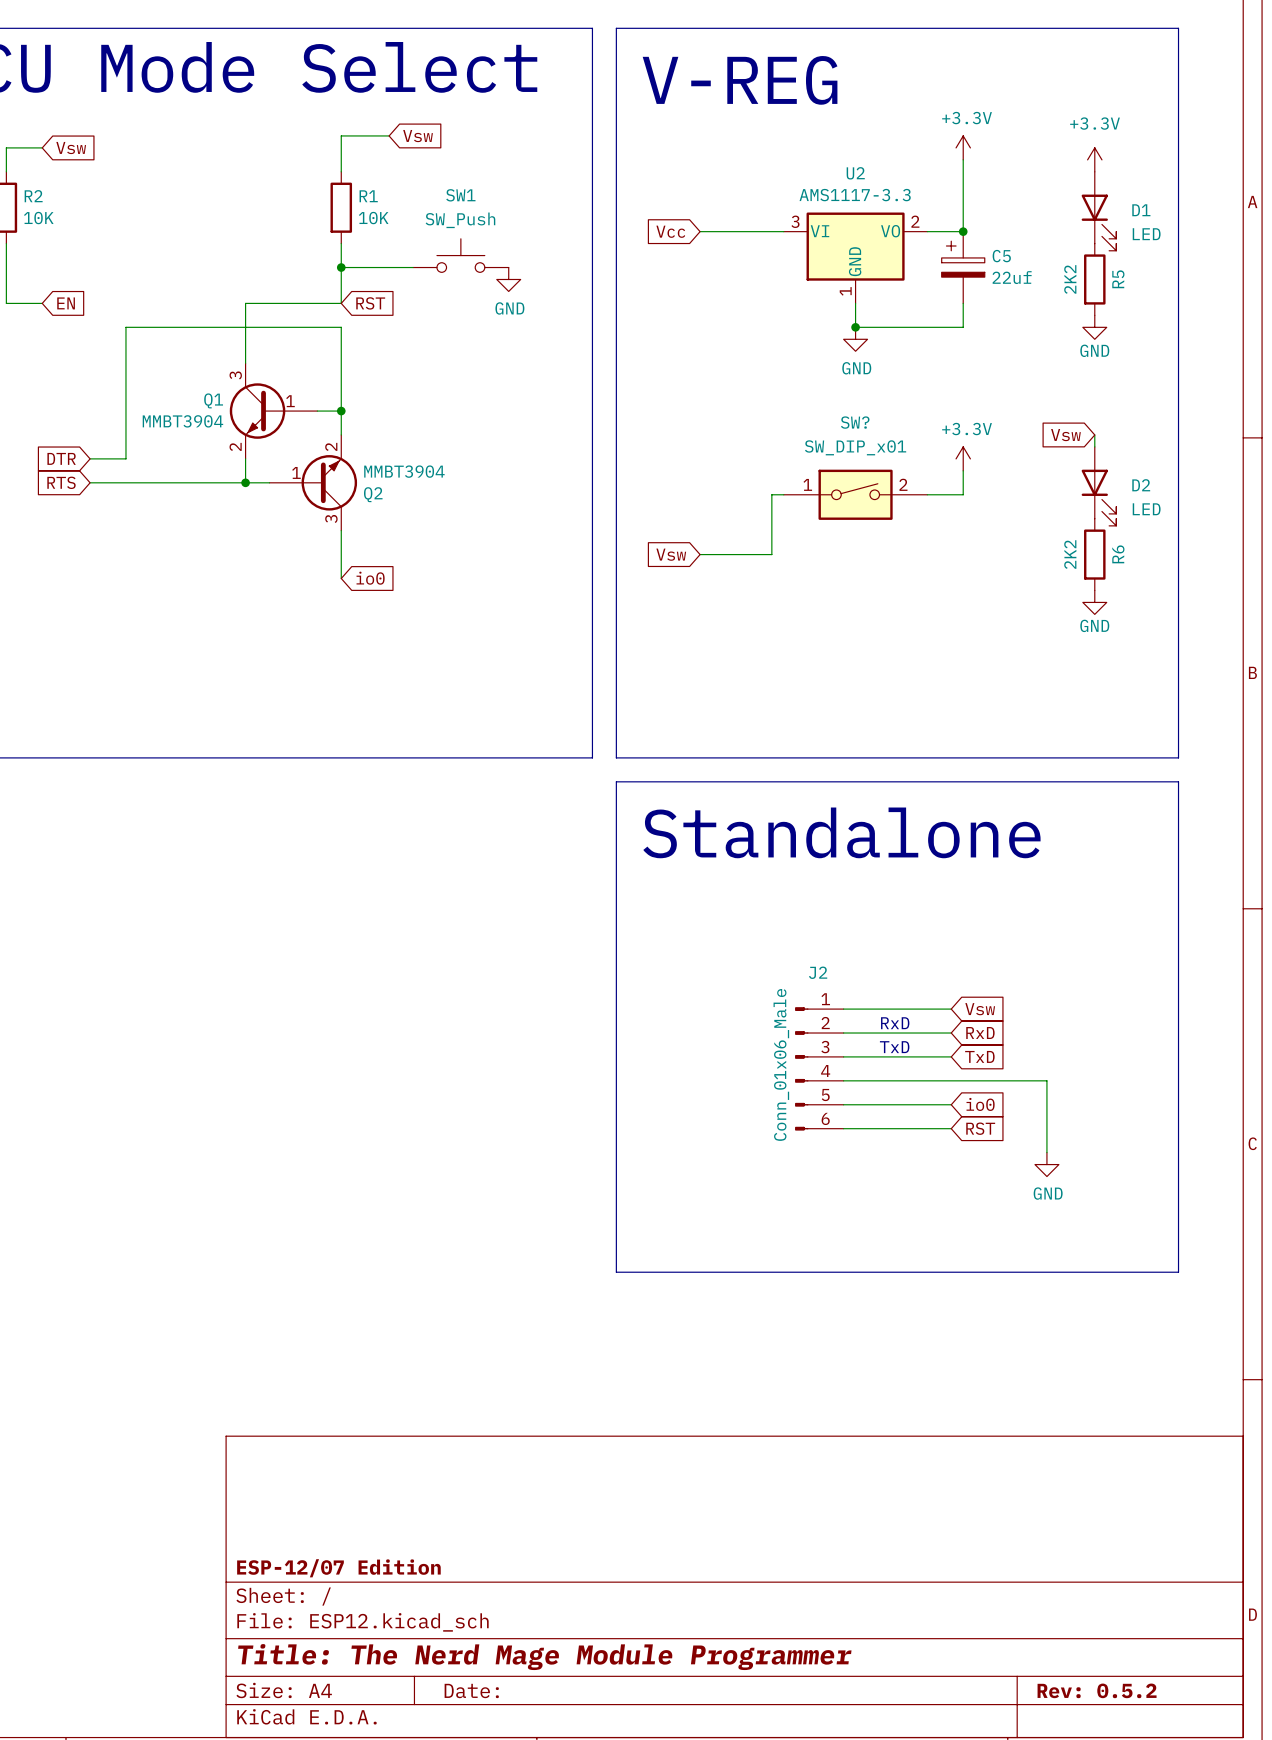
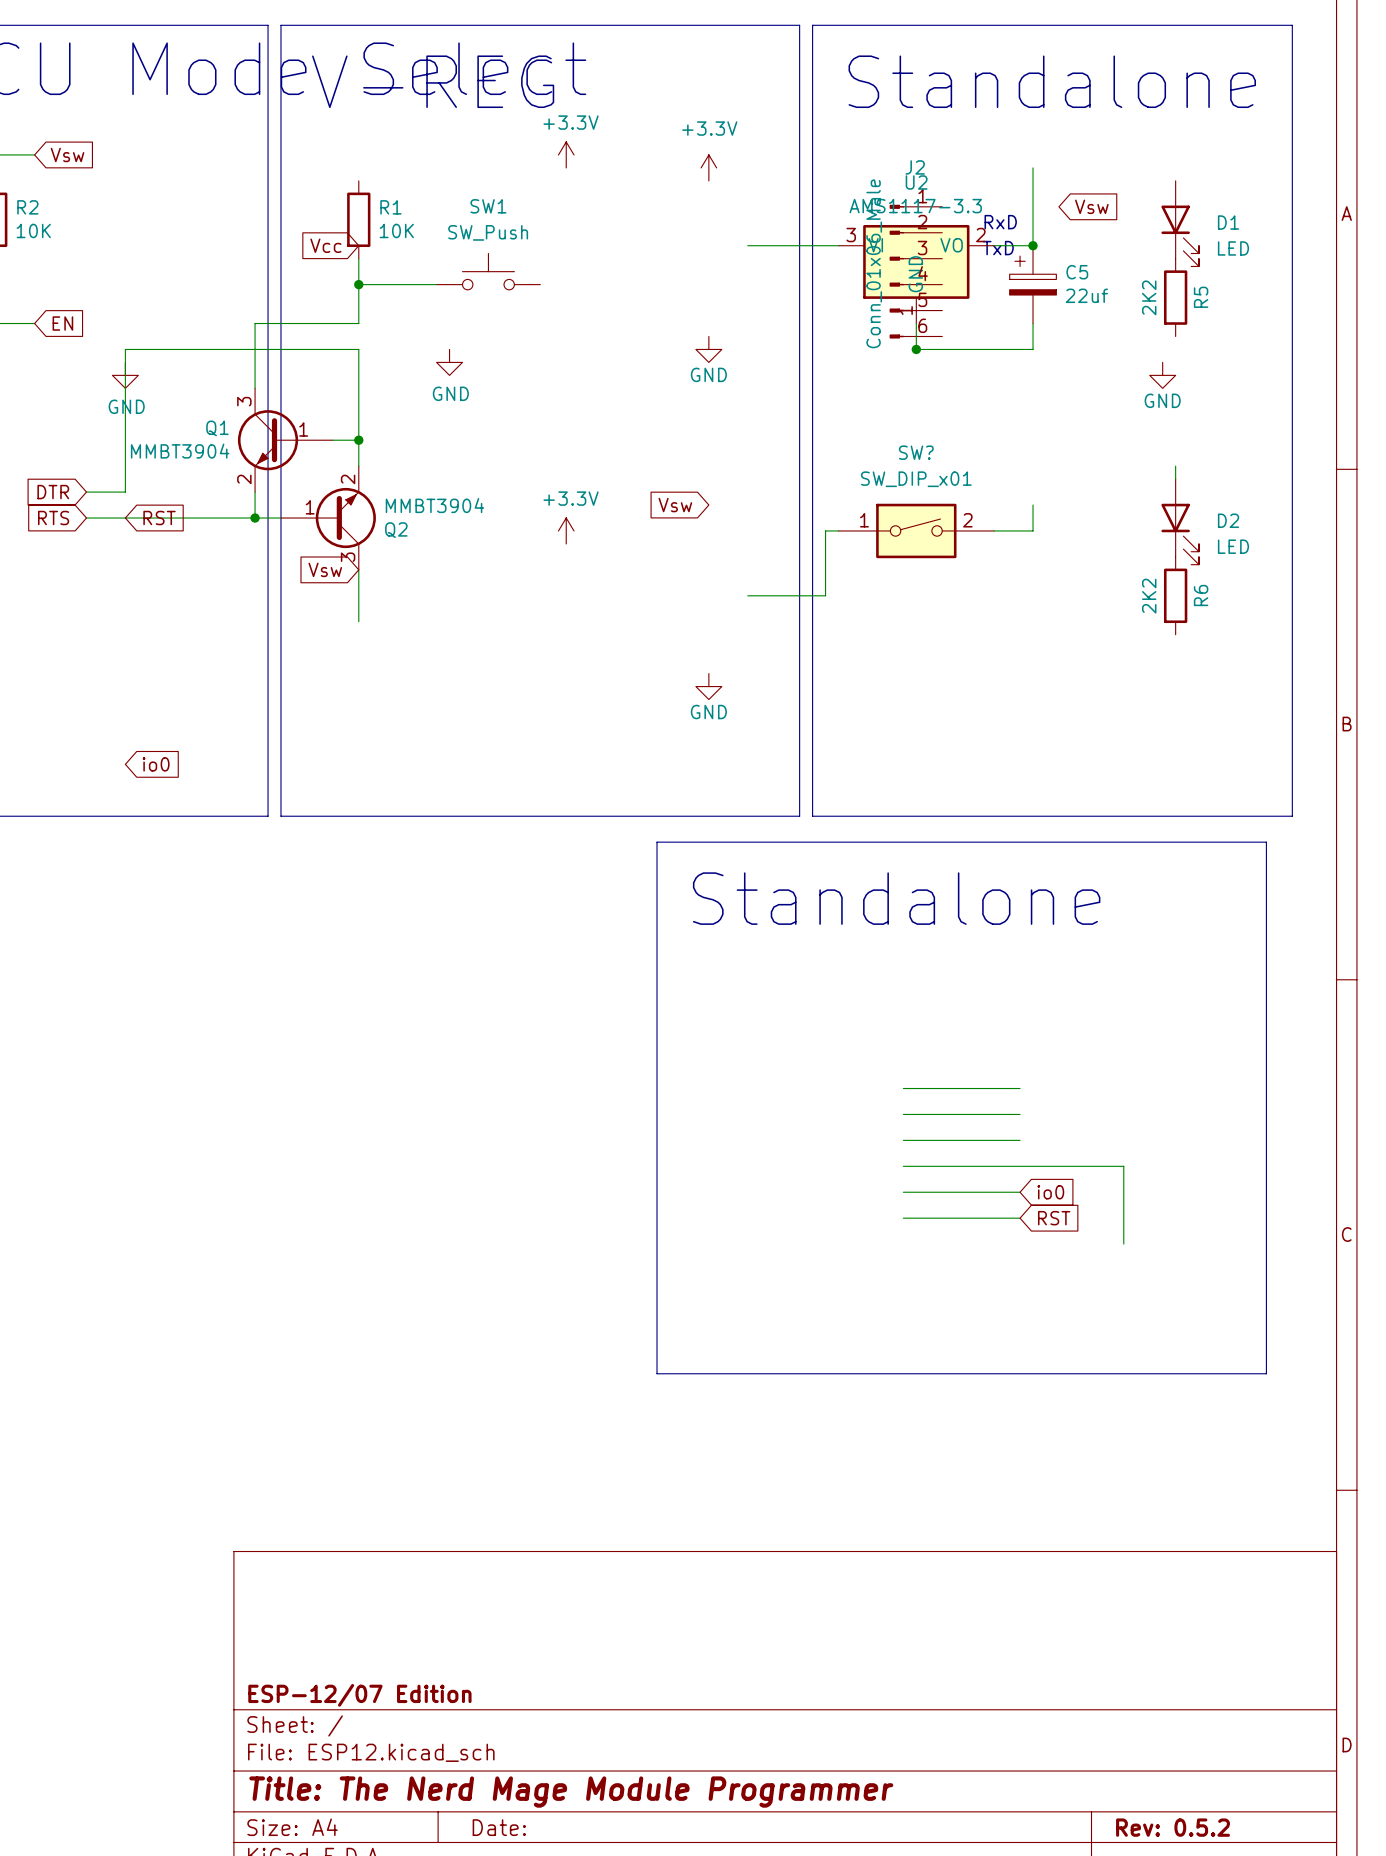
line: (257, 28) (269, 28) -> (268, 25) (268, 816)
line: (592, 28) (592, 757) -> (631, 25) (657, 25)
line: (616, 28) (616, 757) -> (631, 816) (657, 816)
line: (747, 28) (759, 28) -> (799, 25) (799, 816)
line: (1178, 28) (1178, 757) -> (1266, 25) (1292, 25) (1292, 816) (1266, 816)
text: none -> Standalone (1052, 81)
text: none -> V-REG (433, 81)
text: V-REG (740, 80) -> none
wire: (389, 135) (341, 135) (341, 171) -> none
global label: Vsw (418, 136) -> none
power symbol: none -> +3.3V (566, 154)
power symbol: +3.3V (963, 147) -> none
power symbol: none -> +3.3V (708, 167)
power symbol: +3.3V (1094, 159) -> none
global label: none -> Vsw (1091, 206)
text: none -> RxD (1000, 222)
global label: none -> Vcc (325, 245)
global label: Vcc (670, 231) -> none
text: none -> TxD (998, 248)
power symbol: GND (508, 279) -> none
global label: RST (370, 303) -> none
power symbol: none -> GND (708, 349)
power symbol position: GND (1094, 327) -> GND (1162, 375)
power symbol: none -> GND (449, 362)
power symbol: GND (855, 339) -> none
power symbol: none -> GND (125, 375)
global label: Vsw (1065, 435) -> none
power symbol: +3.3V (963, 458) -> none
global label: none -> RST (159, 518)
power symbol: none -> +3.3V (566, 530)
global label: none -> Vsw (325, 569)
global label position: Vsw (671, 554) -> Vsw (675, 505)
global label: io0 (370, 578) -> none
power symbol: GND (1094, 602) -> none
power symbol: none -> GND (708, 686)
global label: none -> io0 (156, 764)
line: (257, 757) (269, 757) -> (280, 25) (280, 816)
line: (747, 757) (759, 757) -> (812, 25) (812, 816)
global label: Vsw (980, 1009) -> none
text: RxD (895, 1023) -> none
global label: RxD (980, 1033) -> none
text: TxD (894, 1047) -> none
global label: TxD (979, 1056) -> none
J2 position: (819, 1068) -> (915, 271)
power symbol: GND (1046, 1164) -> none

